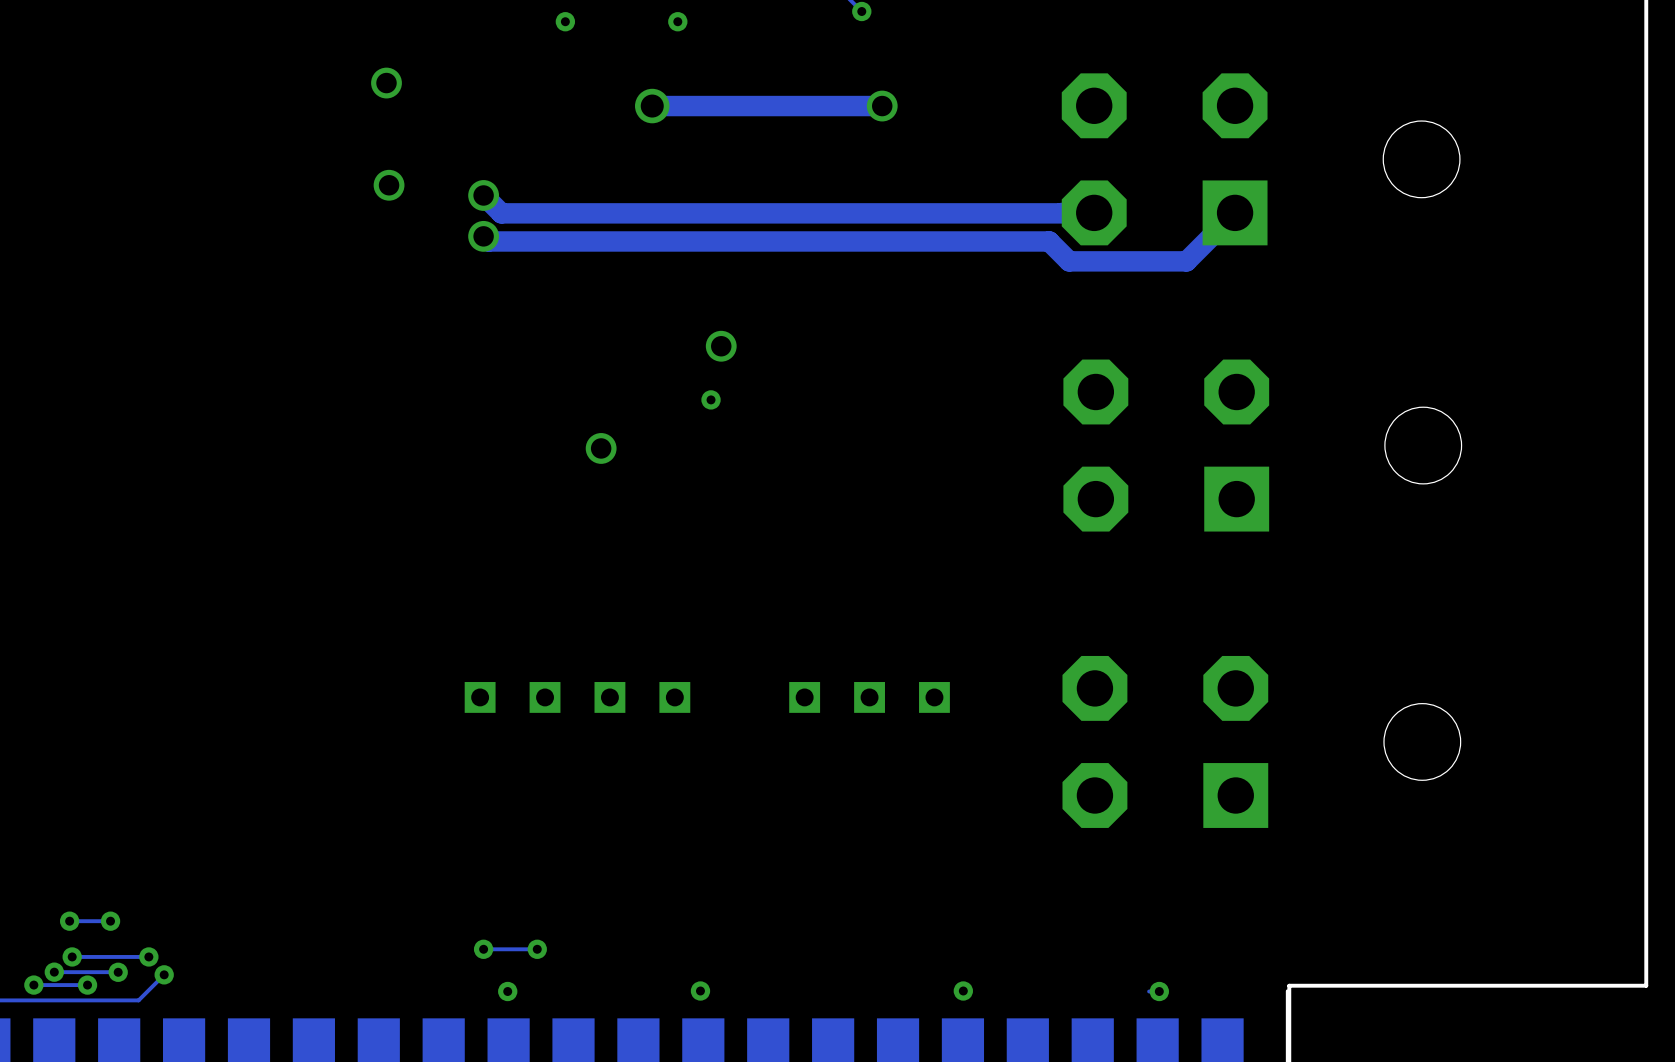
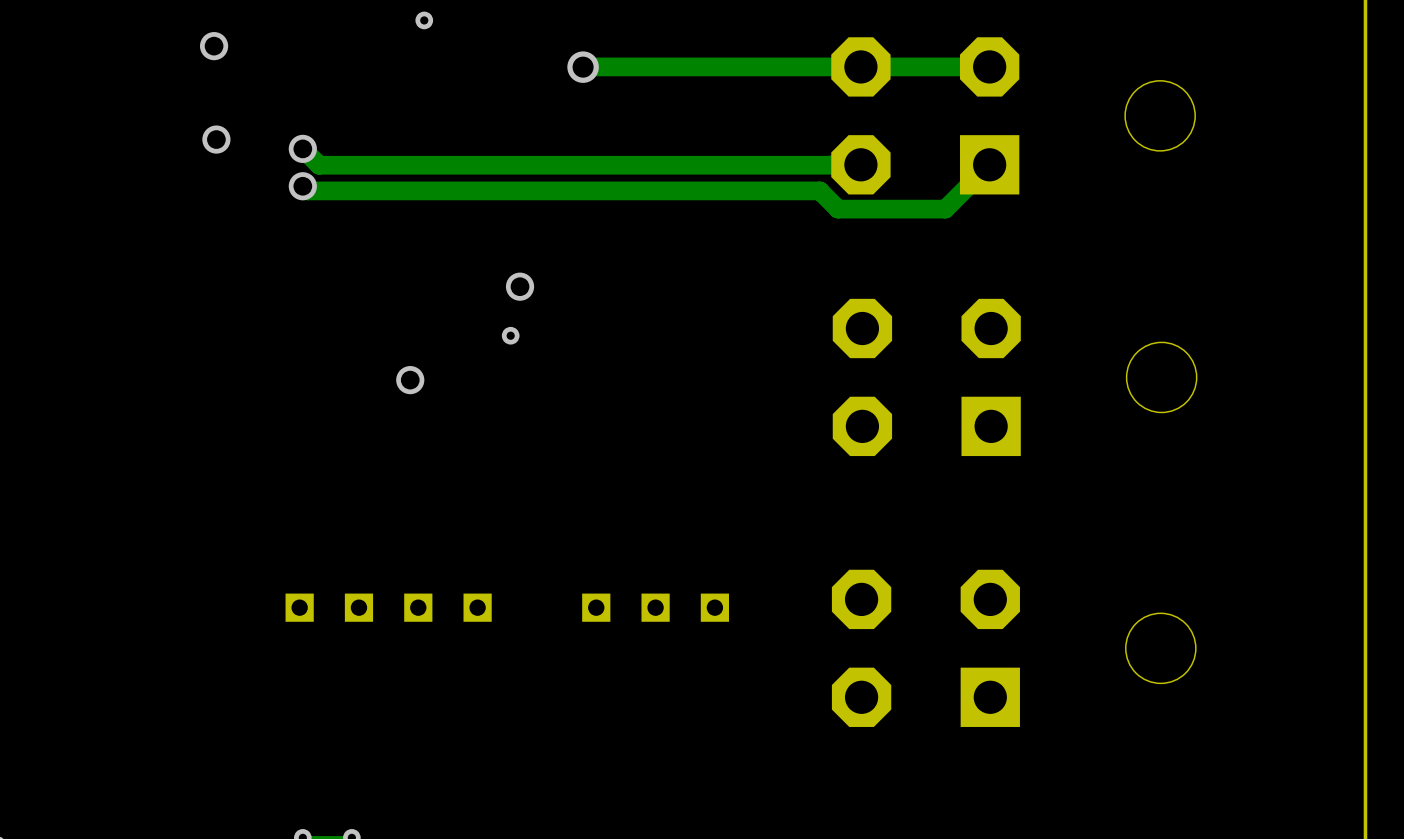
via: none -> (424, 20)
track: none -> (989, 66) (583, 66)
via position: (652, 106) -> (583, 67)
track: (882, 106) (652, 106) -> none
via: (882, 106) -> none

